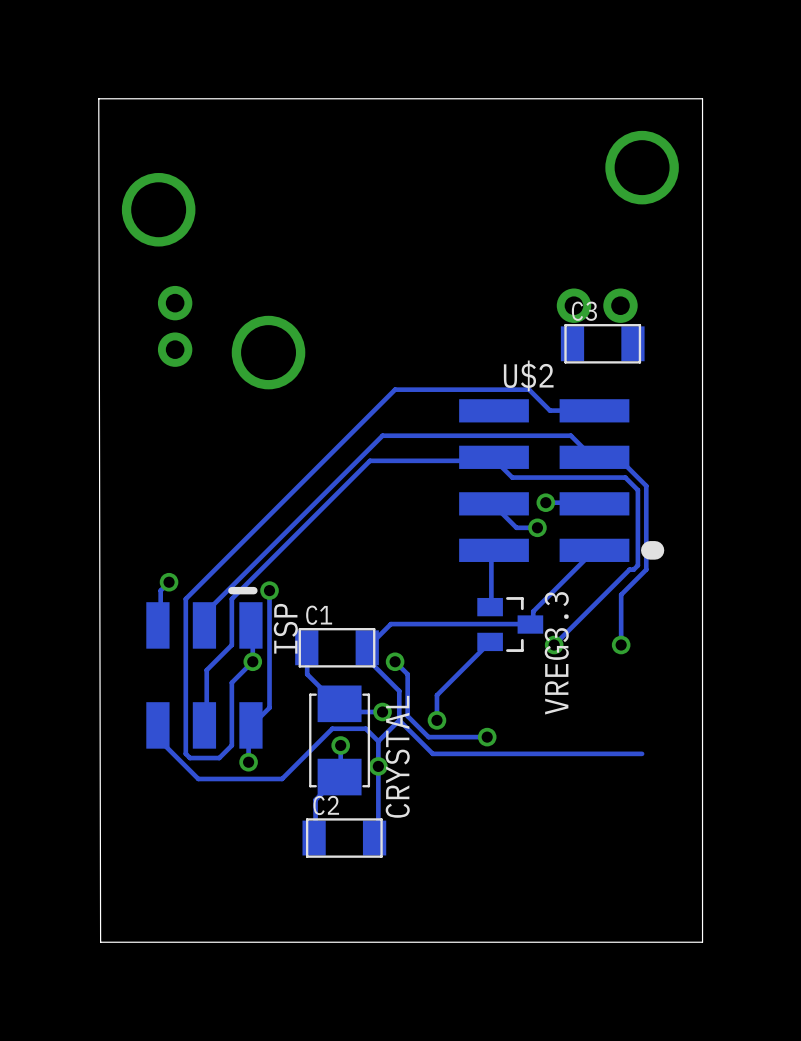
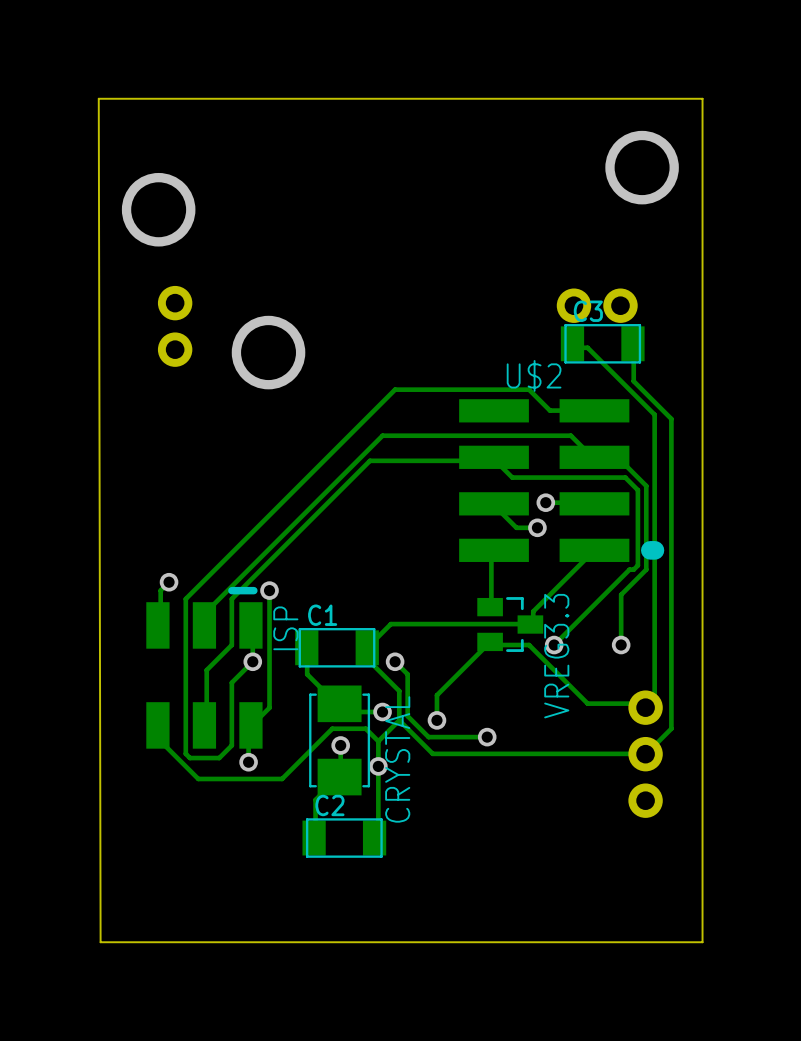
track: none -> (572, 343) (575, 347) (587, 347) (654, 414) (654, 695) (646, 703) (645, 707) (642, 703) (587, 703) (529, 645) (491, 645) (490, 641) (487, 645)
track: none -> (632, 343) (633, 381) (671, 418) (671, 728) (646, 753) (642, 753)
part: none -> (645, 754)

